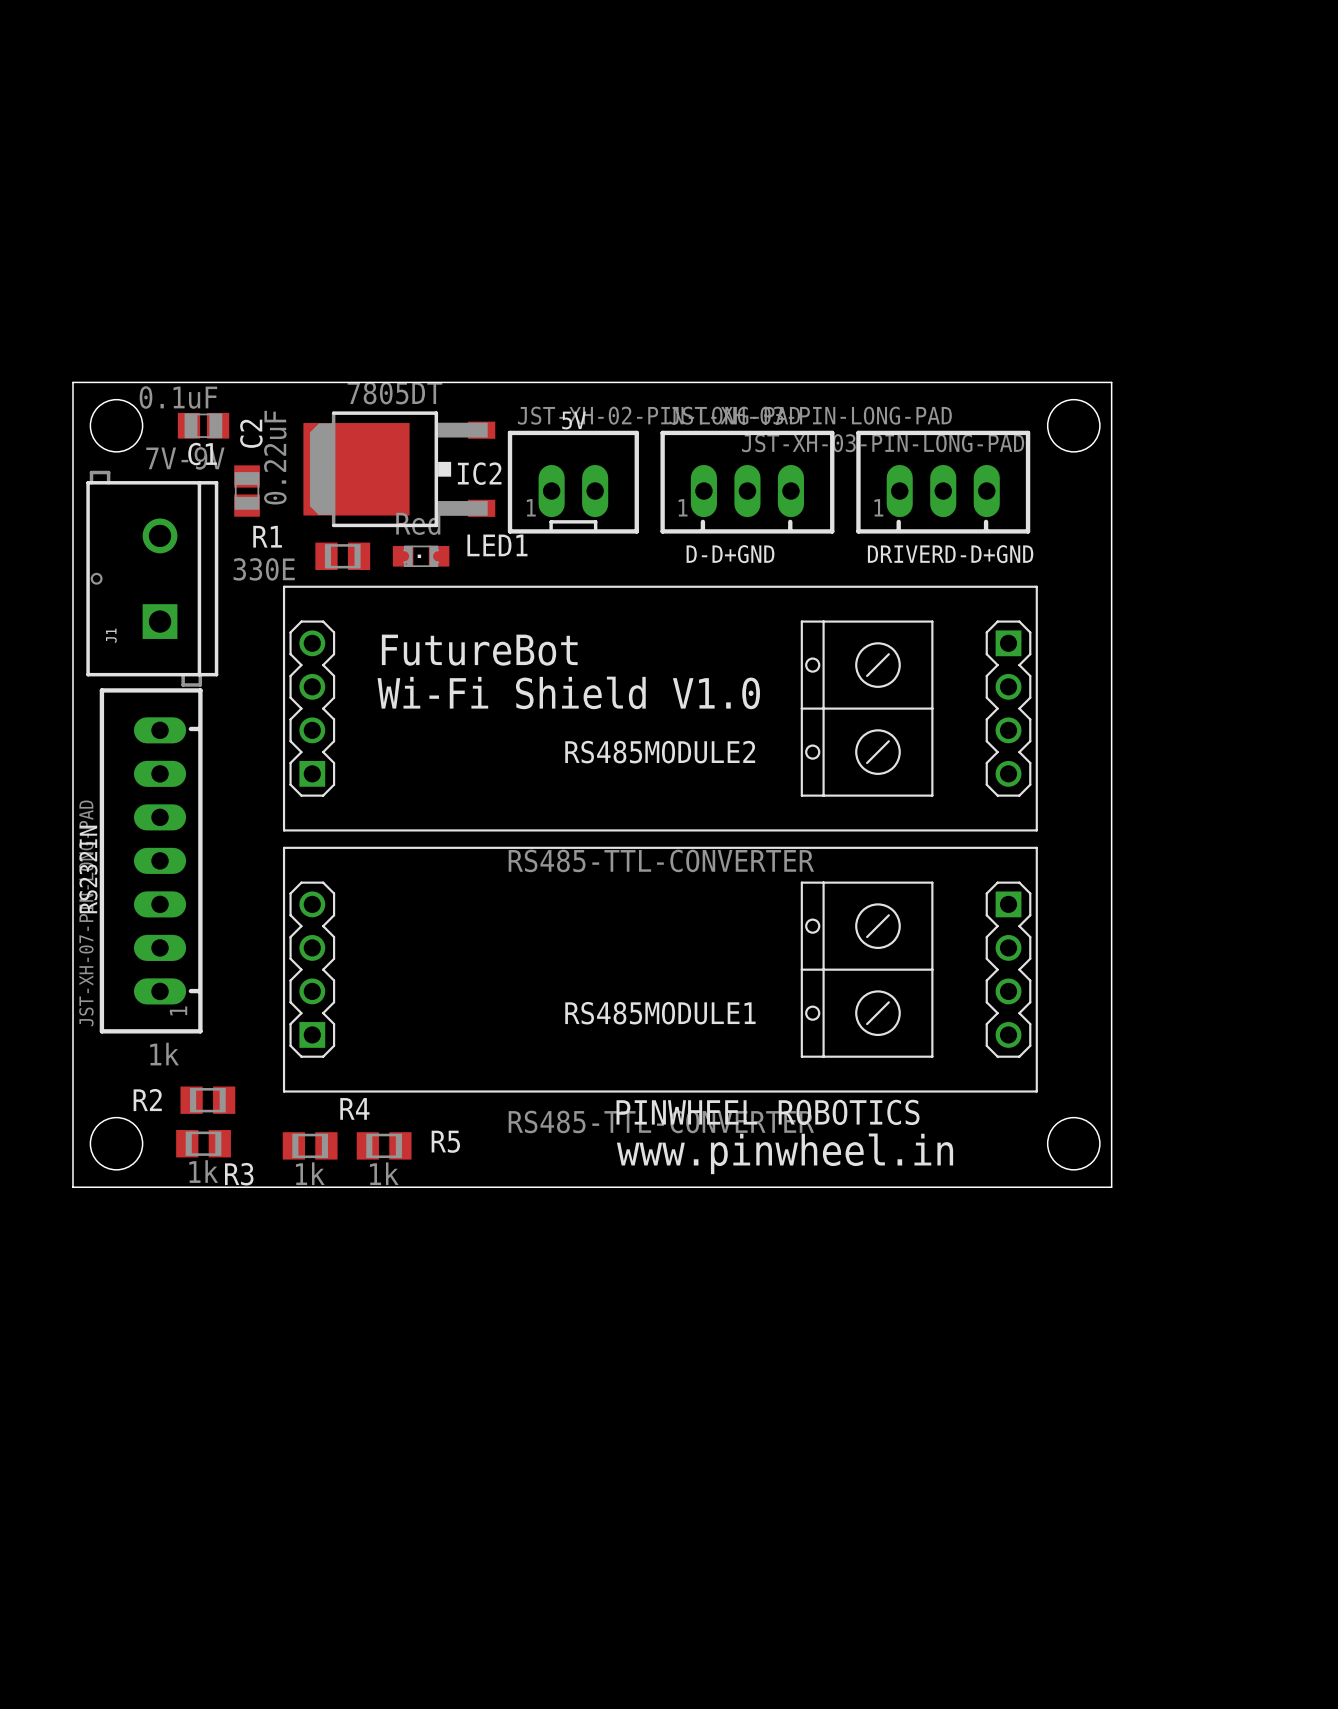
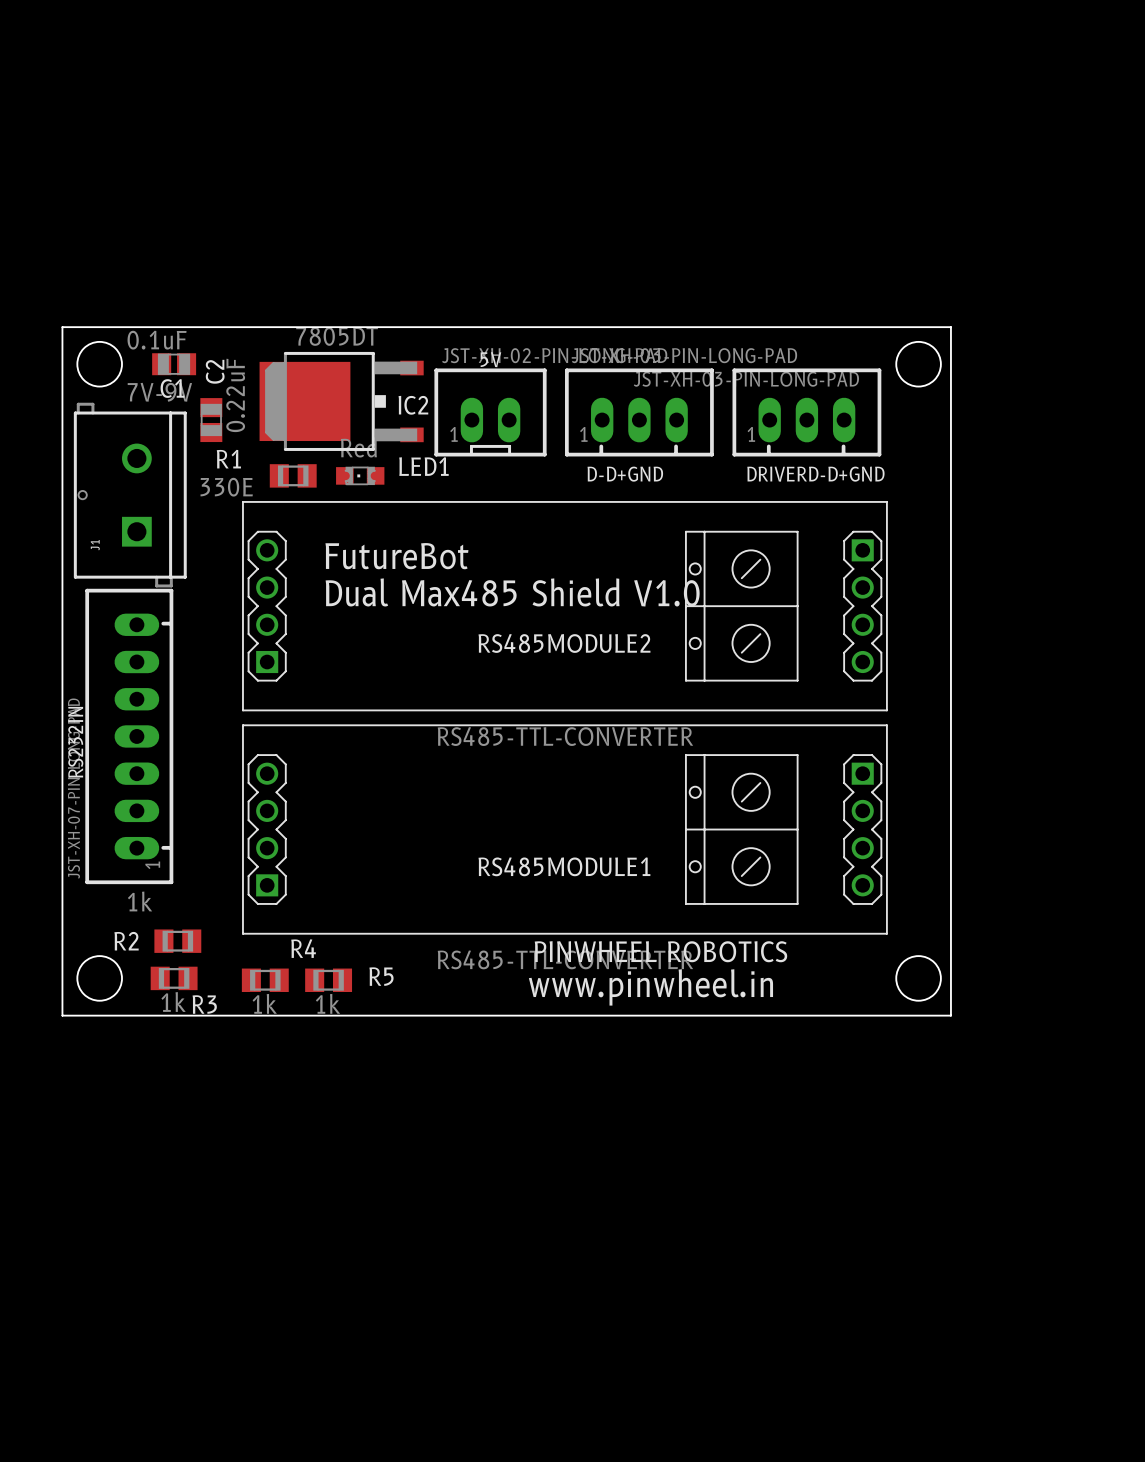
text: Wi-Fi Shield V1.0 (568, 692) -> Dual Max485 Shield V1.0 (512, 592)

